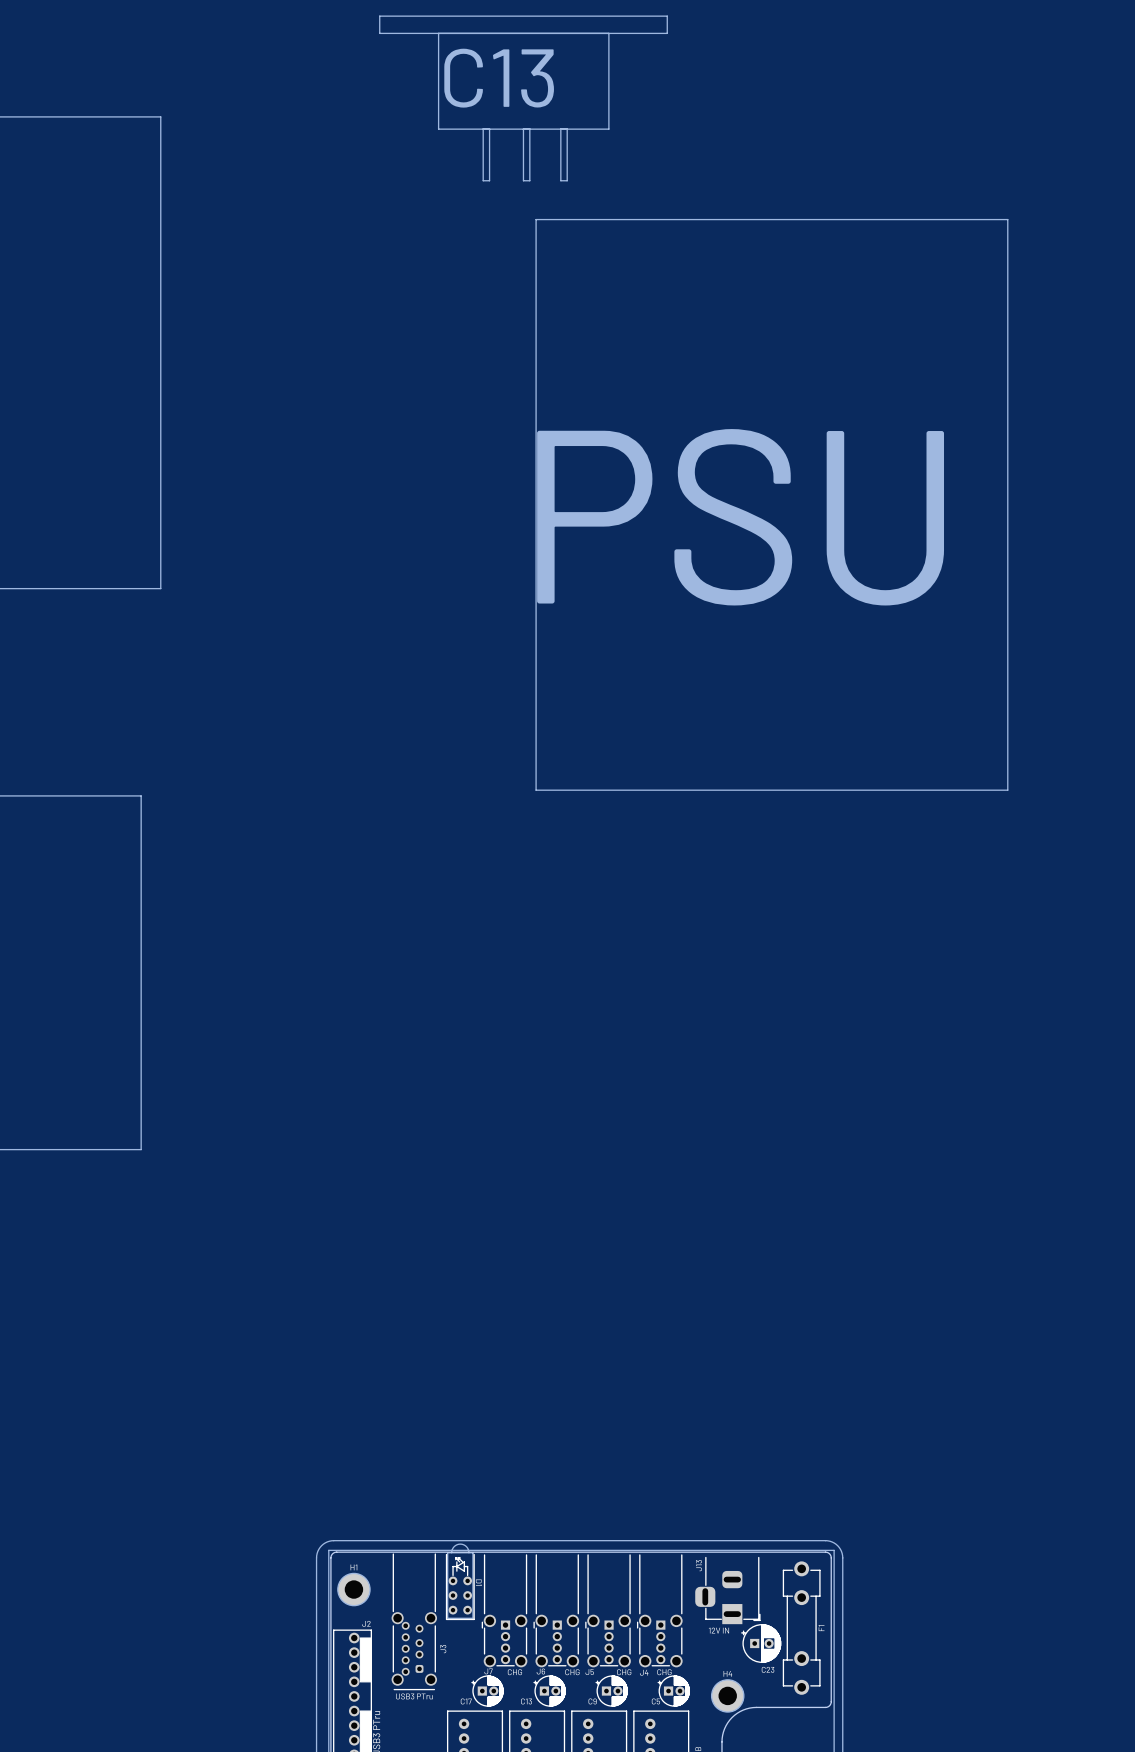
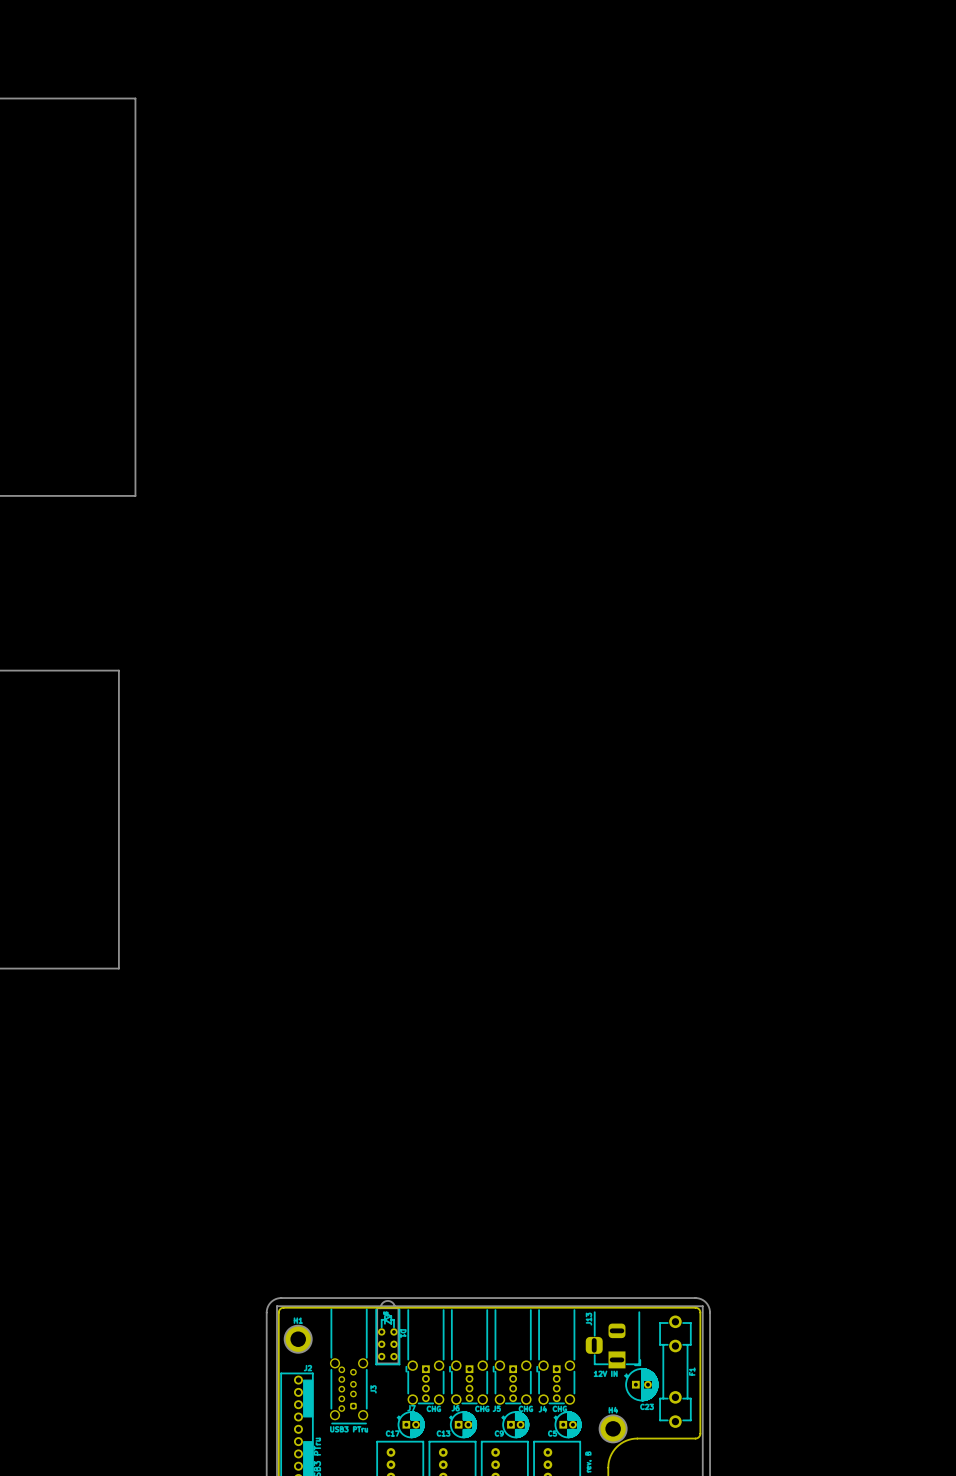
line: (379, 16) (667, 16) (667, 33) (379, 33) (379, 16) -> none
line: (438, 33) (438, 129) (608, 129) (608, 33) -> none
text: C13 (499, 78) -> none
line: (483, 129) (489, 129) (489, 180) (483, 180) (483, 129) -> none
line: (523, 129) (529, 129) (529, 180) (523, 180) (523, 129) -> none
line: (560, 129) (567, 129) (567, 180) (560, 180) (560, 129) -> none
line: (536, 219) (1007, 219) (1007, 790) (536, 790) (536, 219) -> none
text: PSU (740, 517) -> none

